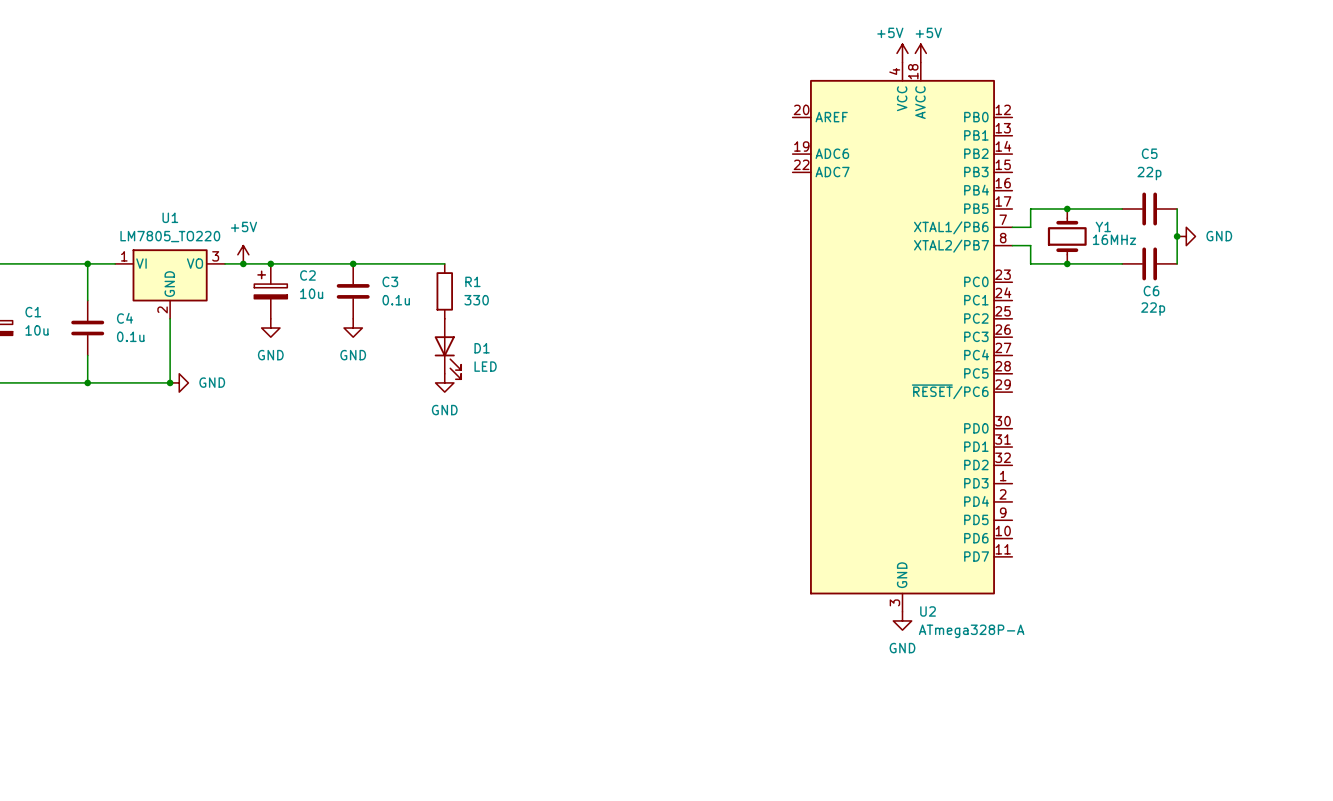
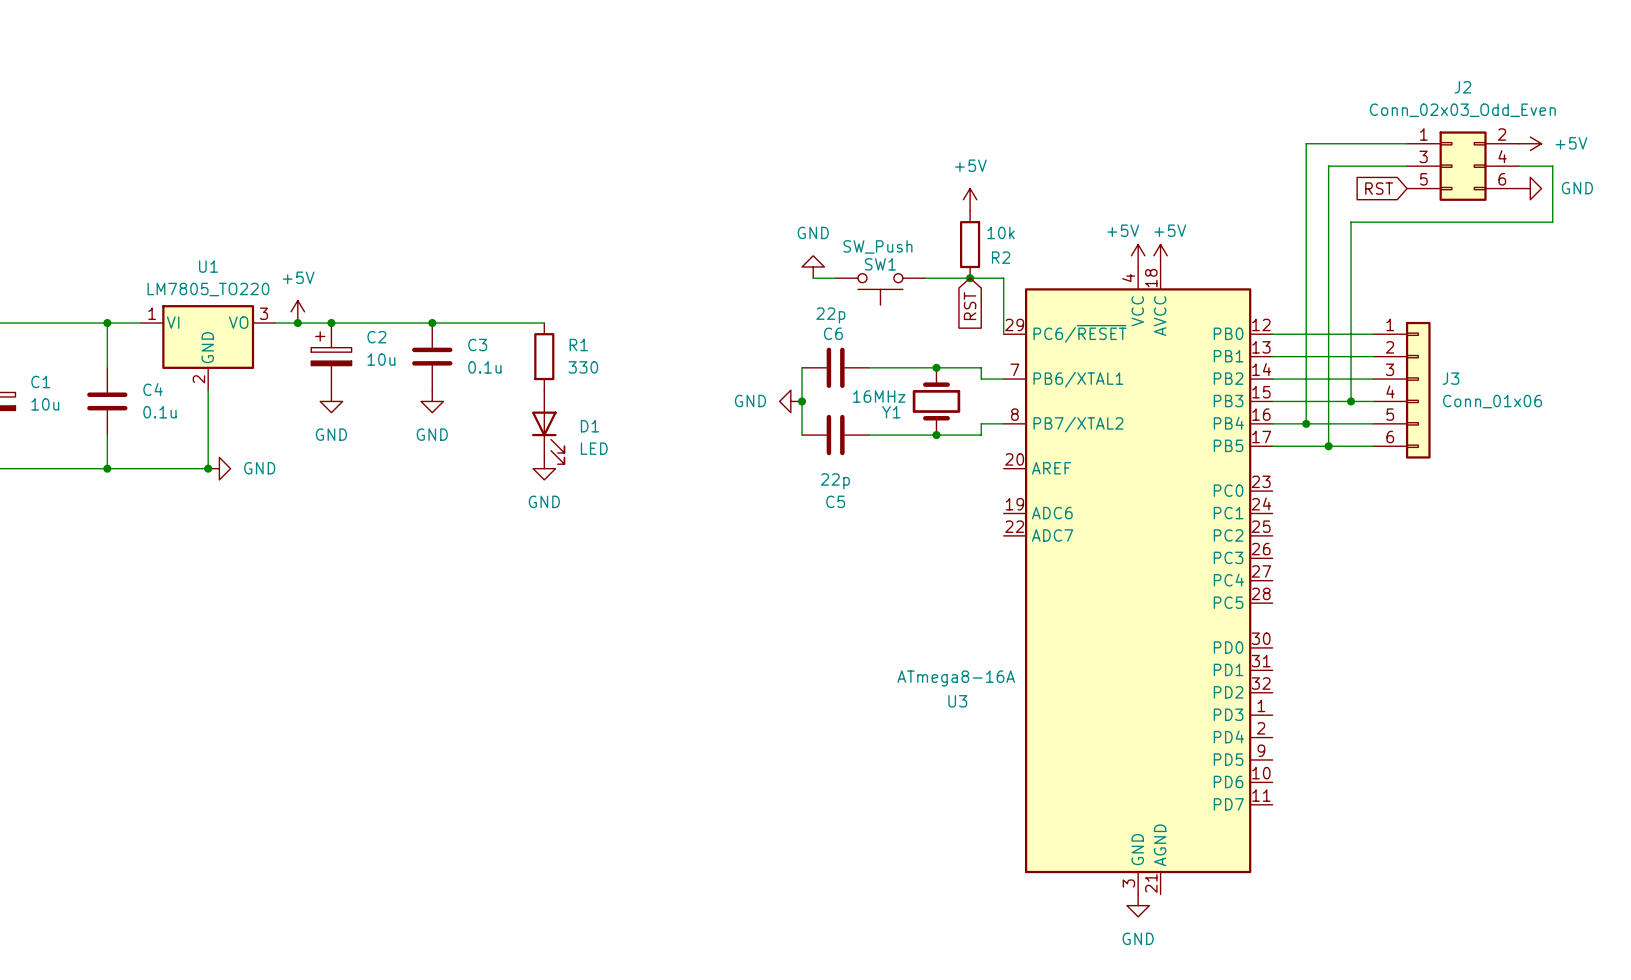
power symbol: +5V (902, 53) -> none
power symbol: +5V (920, 53) -> none
wire: none -> (1407, 143) (1306, 143) (1306, 423)
power symbol: none -> +5V (1530, 143)
wire: none -> (1407, 166) (1328, 166) (1328, 446)
J2: none -> Conn_02x03_Odd_Even (1463, 166)
wire: none -> (1519, 166) (1552, 166) (1552, 222) (1351, 222) (1351, 401)
C5 name position: C5 (1149, 153) -> C5 (835, 501)
global label: none -> RST (1379, 188)
power symbol: none -> +5V (970, 199)
C5 value position: 22p (1149, 173) -> 22p (835, 481)
R2: none -> 10k (970, 244)
power symbol: none -> +5V (1138, 255)
power symbol: none -> +5V (1160, 255)
junction: (1067, 209) -> none
wire: (1122, 209) (1030, 209) (1030, 227) (1012, 227) -> none
C5 position: (1149, 209) -> (835, 435)
wire: (1177, 209) (1177, 263) -> none
power symbol: none -> GND (813, 266)
Y1 name position: Y1 (1103, 226) -> Y1 (891, 412)
wire: none -> (813, 278) (835, 278)
wire: none -> (925, 278) (1003, 278) (1003, 334)
junction: none -> (970, 278)
SW1: none -> SW_Push (880, 289)
Y1 position: (1067, 236) -> (936, 401)
junction: (1177, 236) -> none
power symbol position: GND (1186, 236) -> GND (1530, 188)
power symbol text position: GND (1219, 236) -> GND (1577, 188)
Y1 value position: 16MHz (1114, 239) -> 16MHz (879, 396)
wire: (1012, 245) (1030, 245) (1030, 263) (1122, 263) -> none
global label: none -> RST (970, 306)
junction: (1067, 263) -> none
C6 position: (1149, 263) -> (835, 367)
wire: none -> (1272, 334) (1373, 334)
wire: none -> (1272, 356) (1373, 356)
C6 name position: C6 (1151, 291) -> C6 (833, 333)
wire: none -> (802, 367) (802, 435)
wire: none -> (869, 367) (981, 367) (981, 379) (1003, 379)
junction: none -> (936, 367)
wire: none -> (1272, 379) (1373, 379)
C6 value position: 22p (1153, 309) -> 22p (830, 315)
J3: none -> Conn_01x06 (1402, 390)
power symbol: none -> GND (790, 401)
junction: none -> (802, 401)
wire: none -> (1272, 401) (1373, 401)
junction: none -> (1351, 401)
U2: ATmega328P-A (902, 337) -> none
wire: none -> (1003, 423) (981, 423) (981, 435) (869, 435)
wire: none -> (1272, 423) (1373, 423)
junction: none -> (1306, 423)
junction: none -> (936, 435)
wire: none -> (1272, 446) (1373, 446)
junction: none -> (1328, 446)
U3: none -> ATmega8-16A (1138, 580)
power symbol position: GND (902, 620) -> GND (1138, 905)

